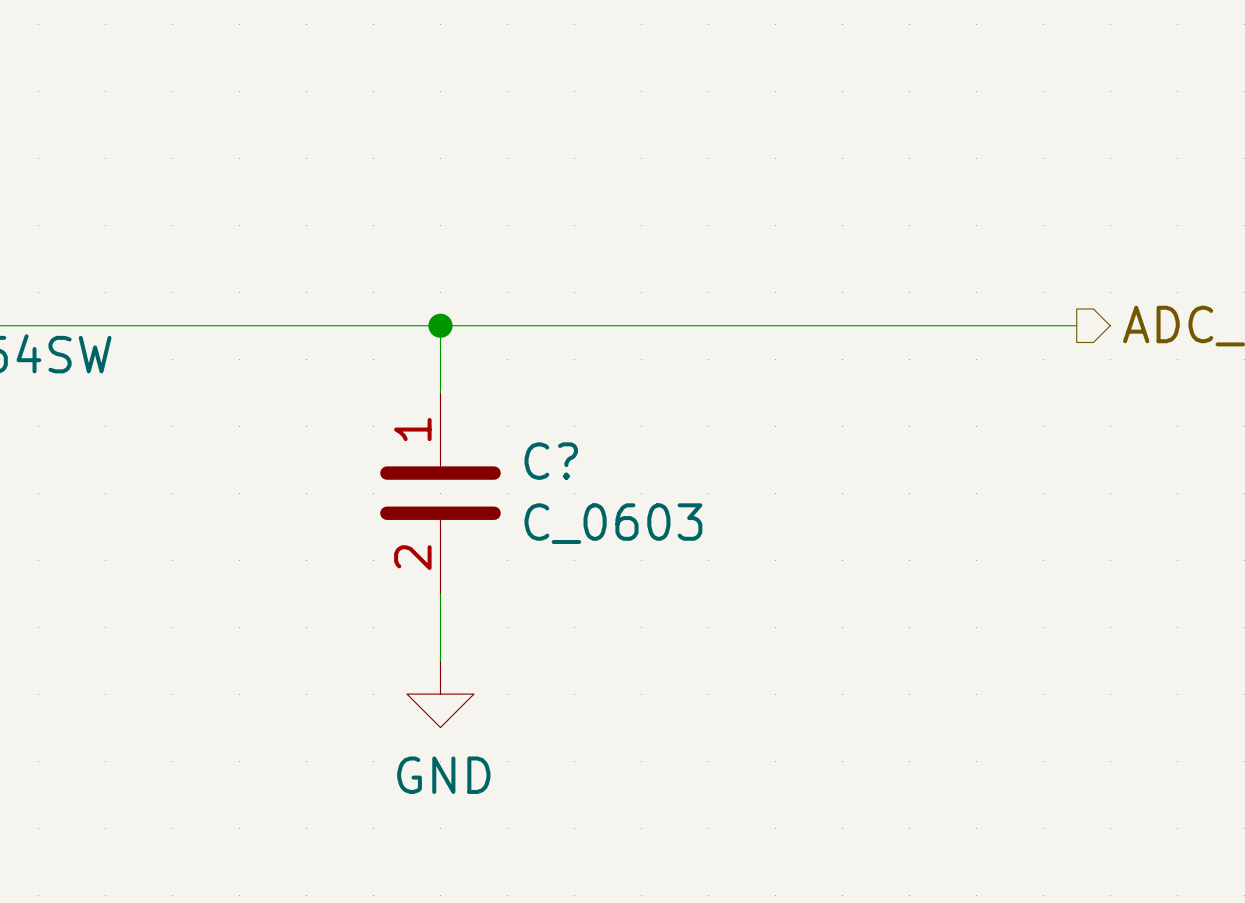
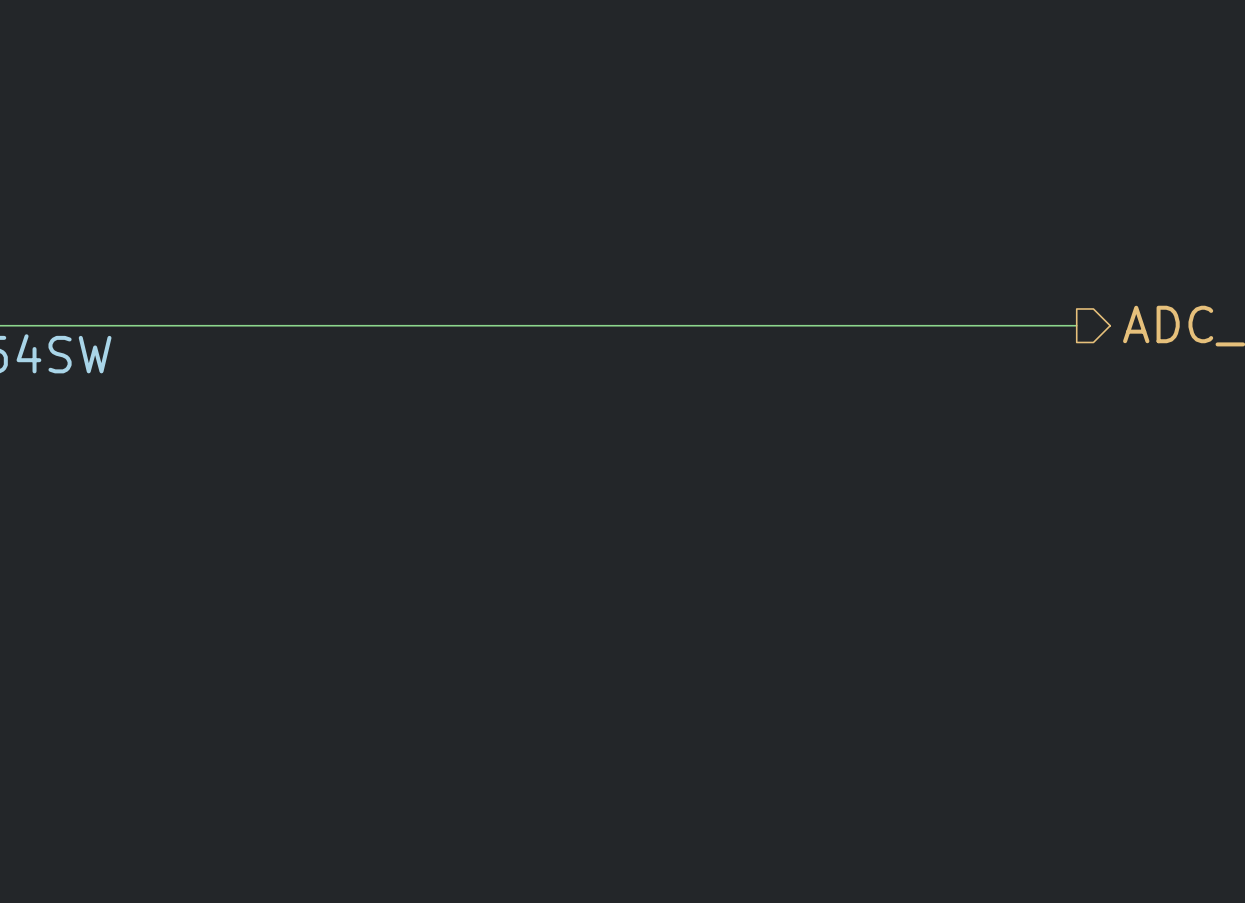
wire: (440, 325) (440, 392) -> none
junction: (440, 325) -> none
C?: C_0603 (440, 493) -> none
wire: (440, 593) (440, 660) -> none
power symbol: GND (440, 694) -> none

